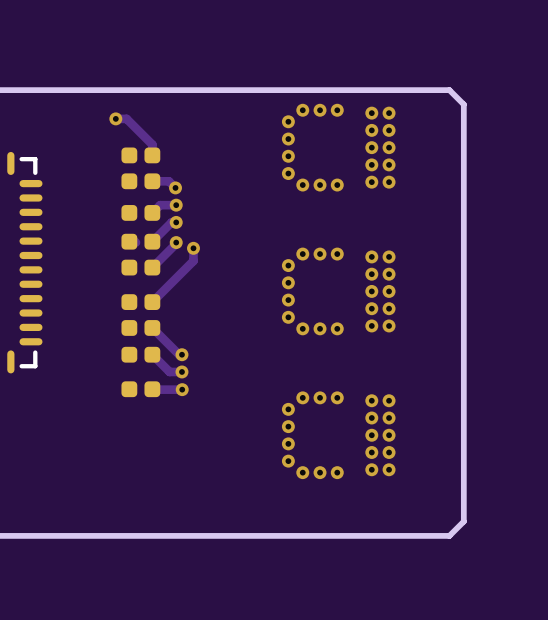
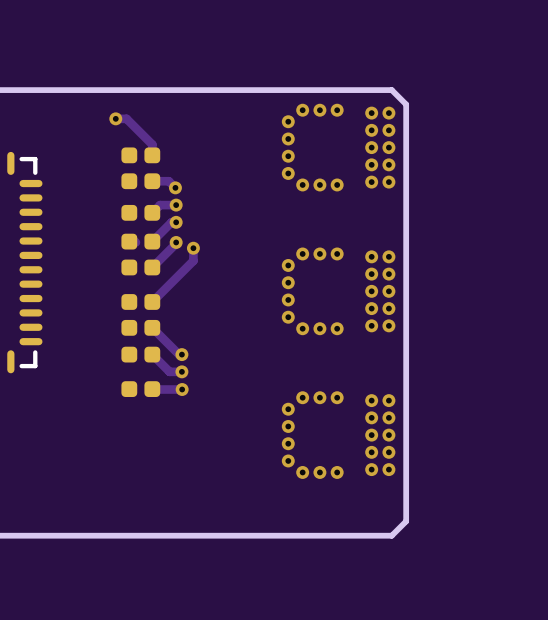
board edge: (391, 90) (449, 90) (463, 104) (463, 521) (449, 535) (391, 535) -> (391, 90) (406, 104) (406, 521) (391, 535)

